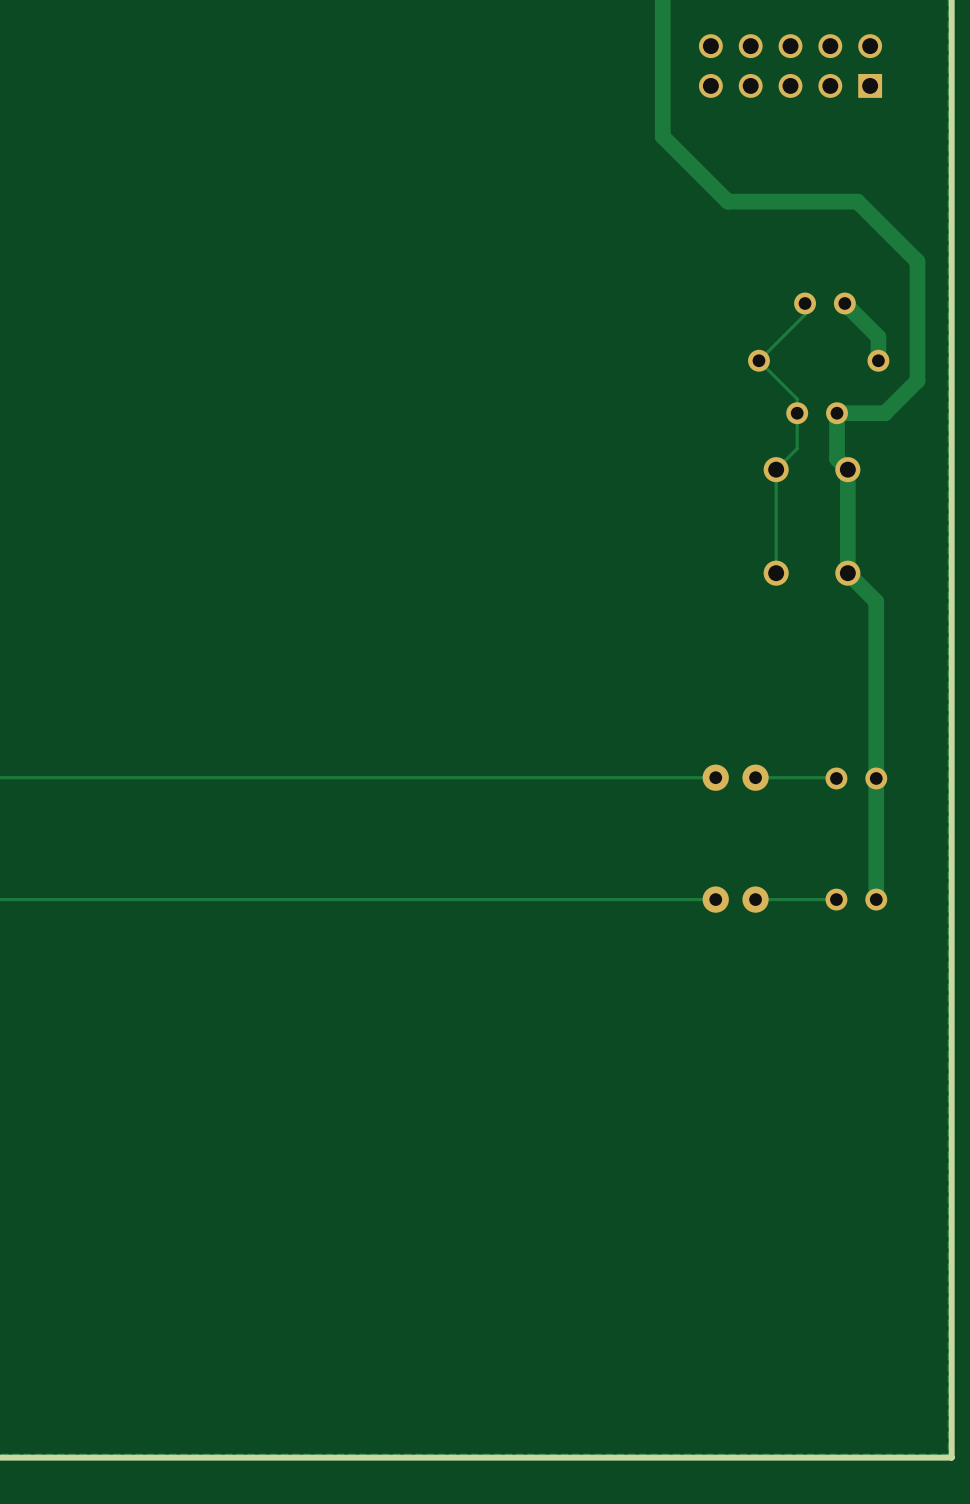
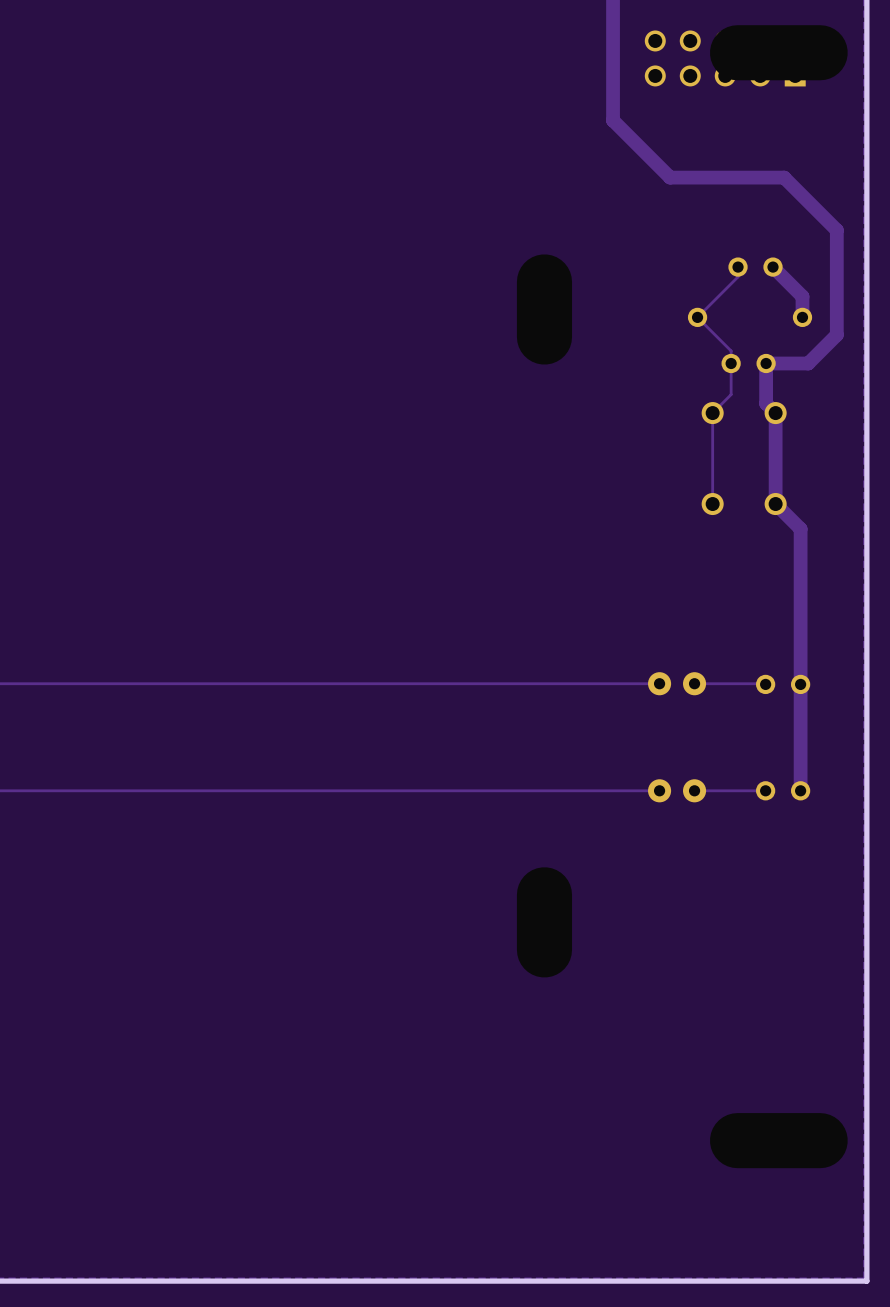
part: none -> (778, 52)
part: none -> (544, 309)
part: none -> (544, 922)
part: none -> (778, 1140)

